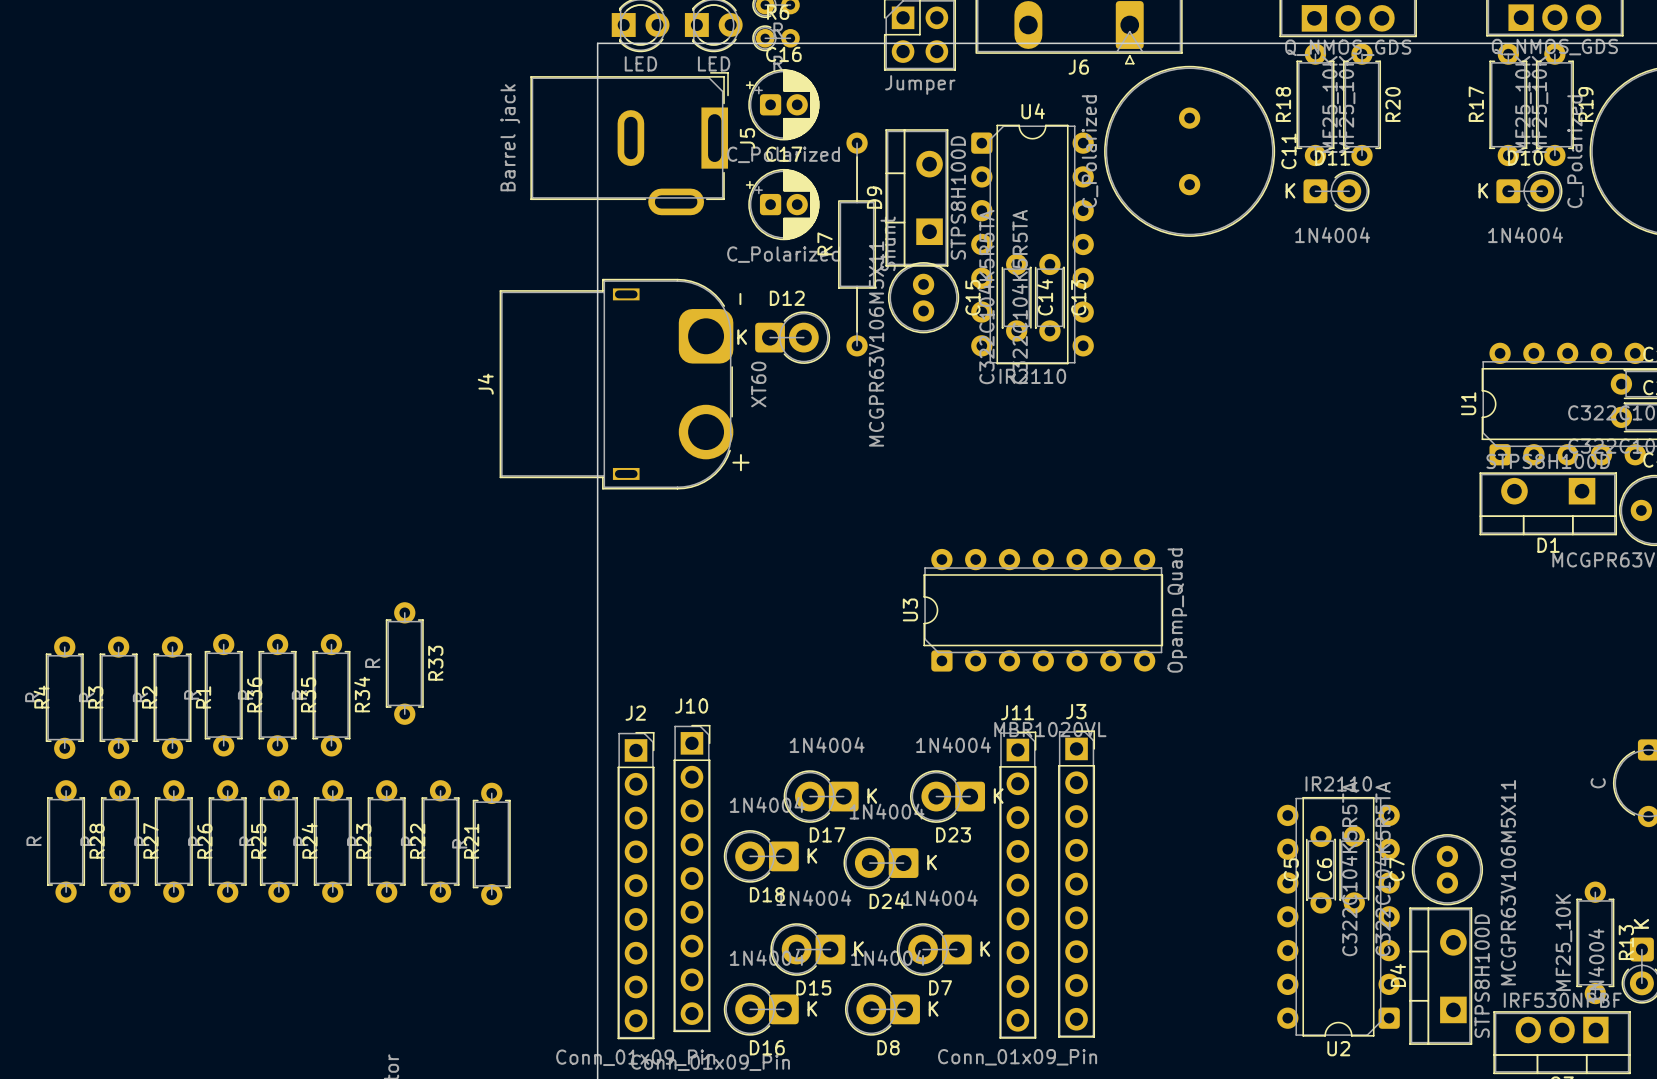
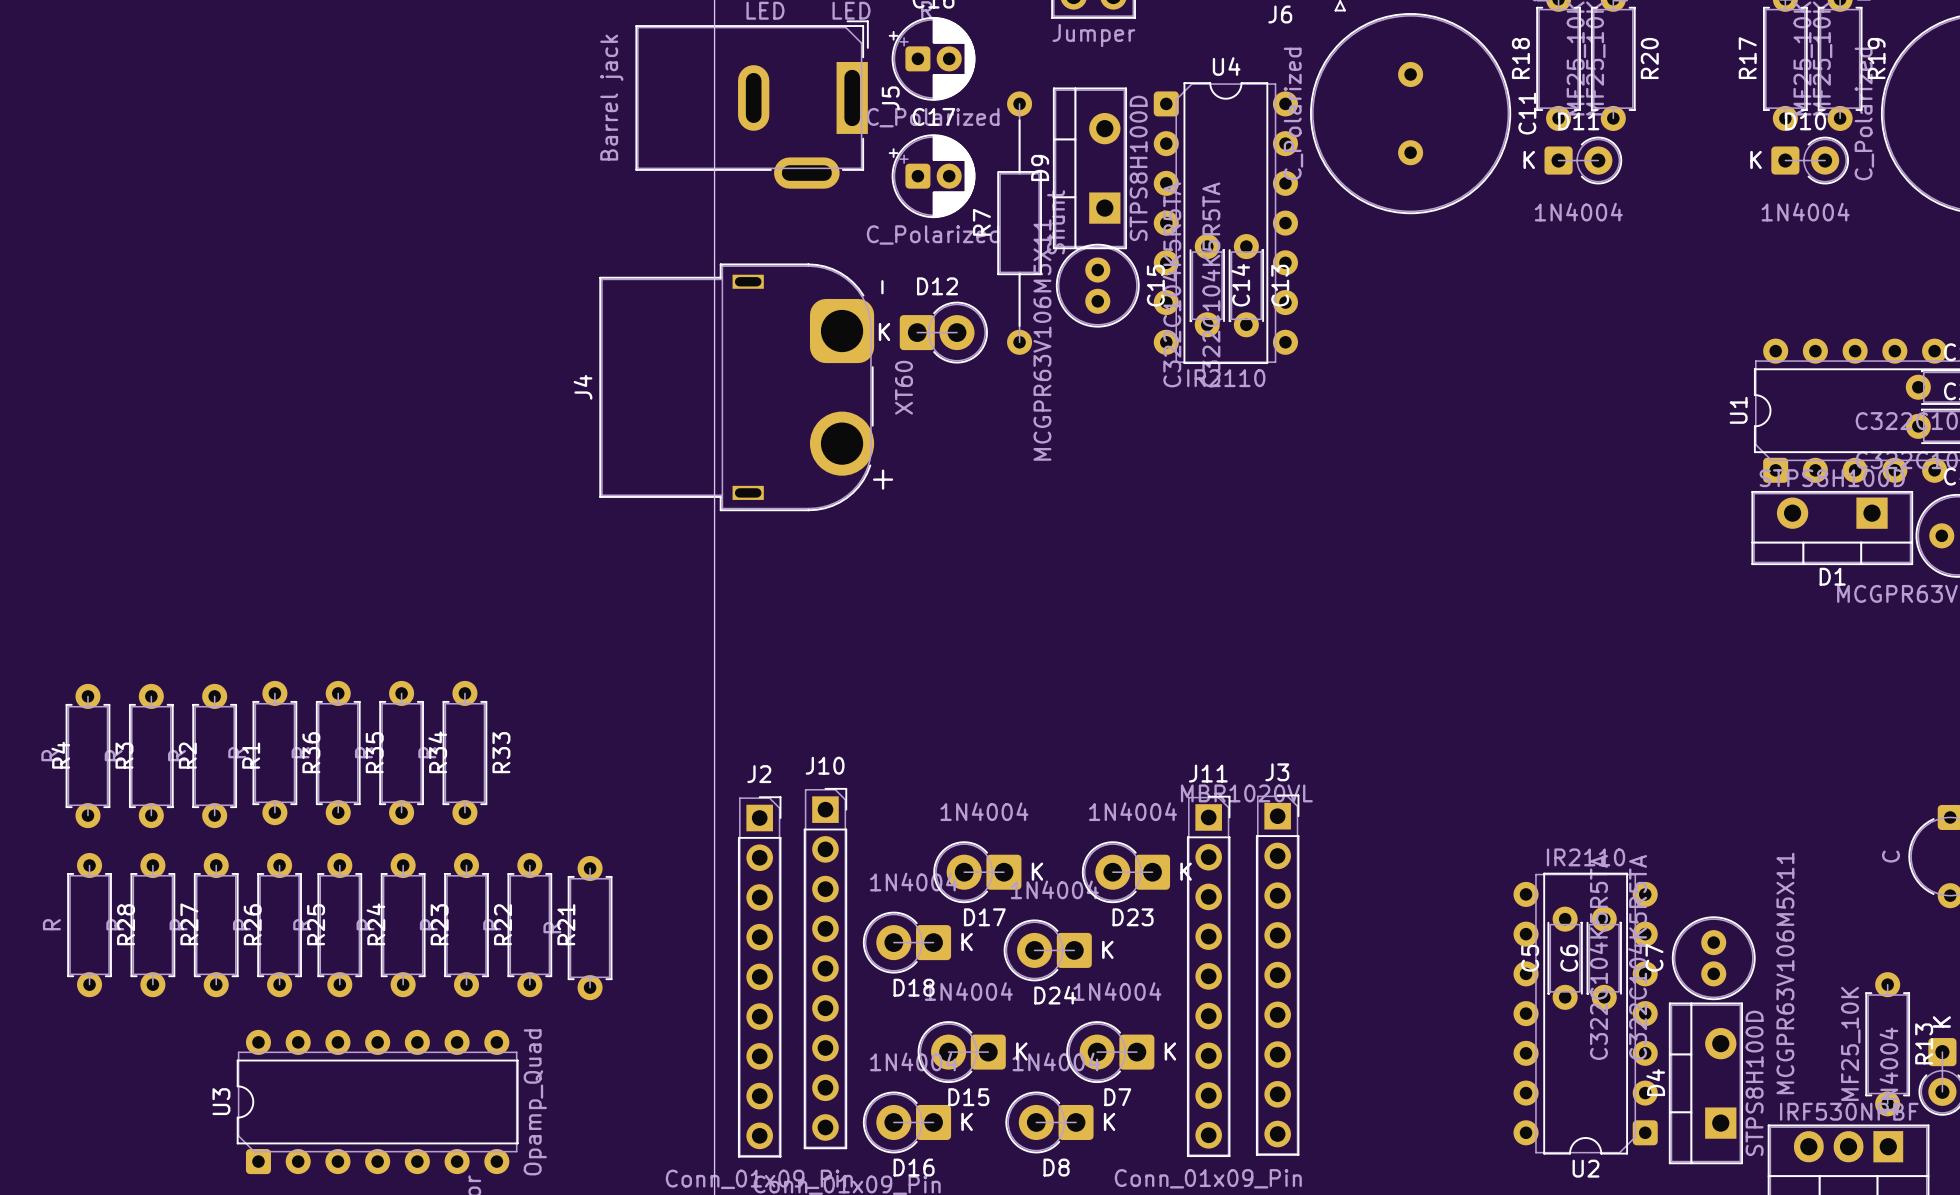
U3 position: (1043, 610) -> (377, 1101)
R33 position: (404, 663) -> (464, 753)

